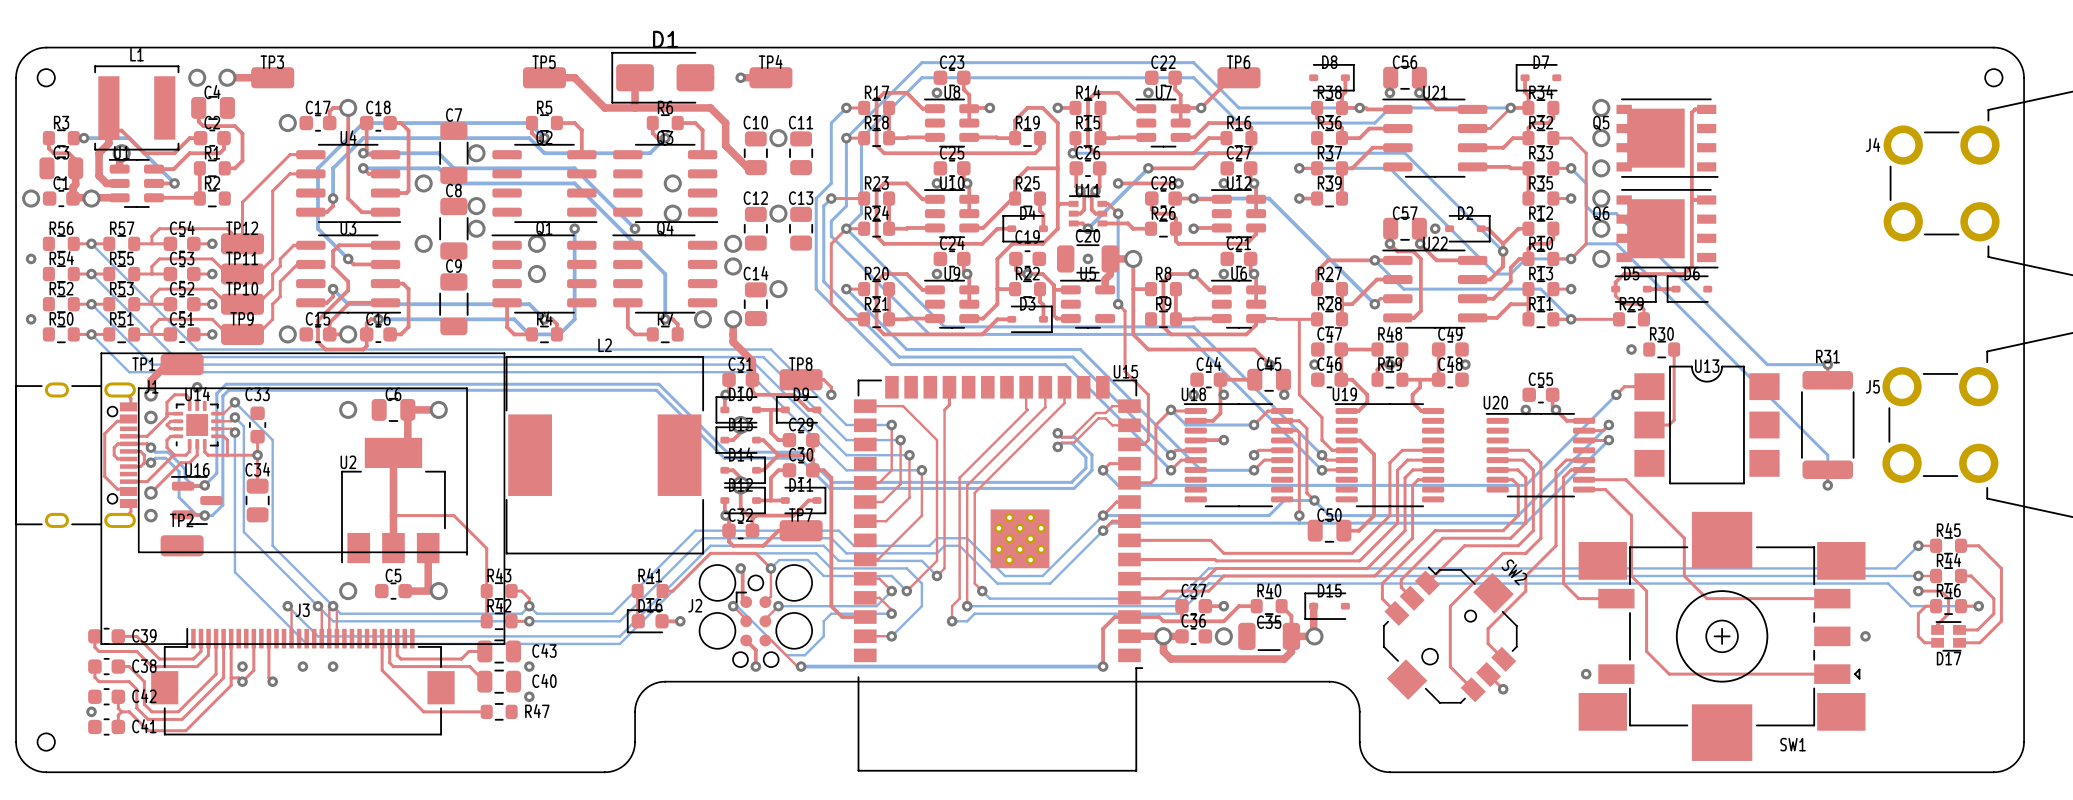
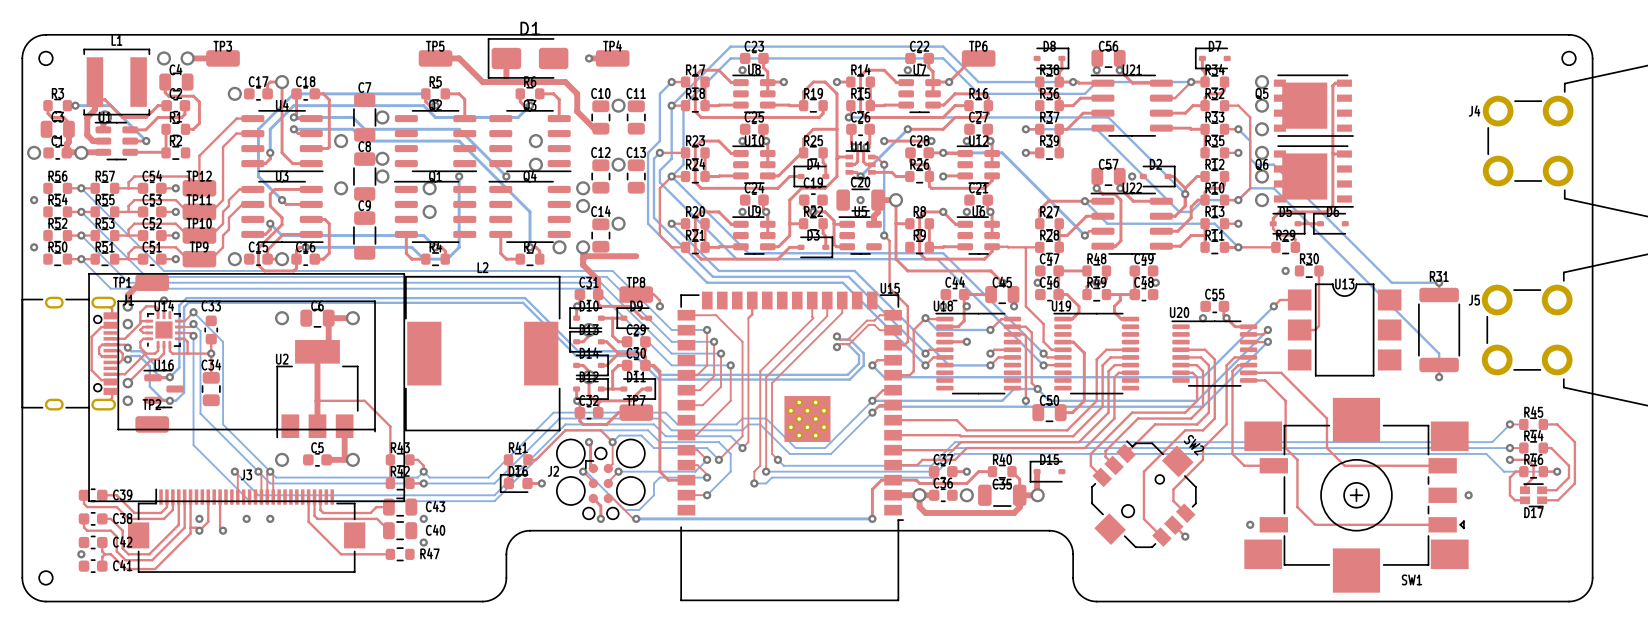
top track: none -> (636, 256) (586, 256) (583, 259)

